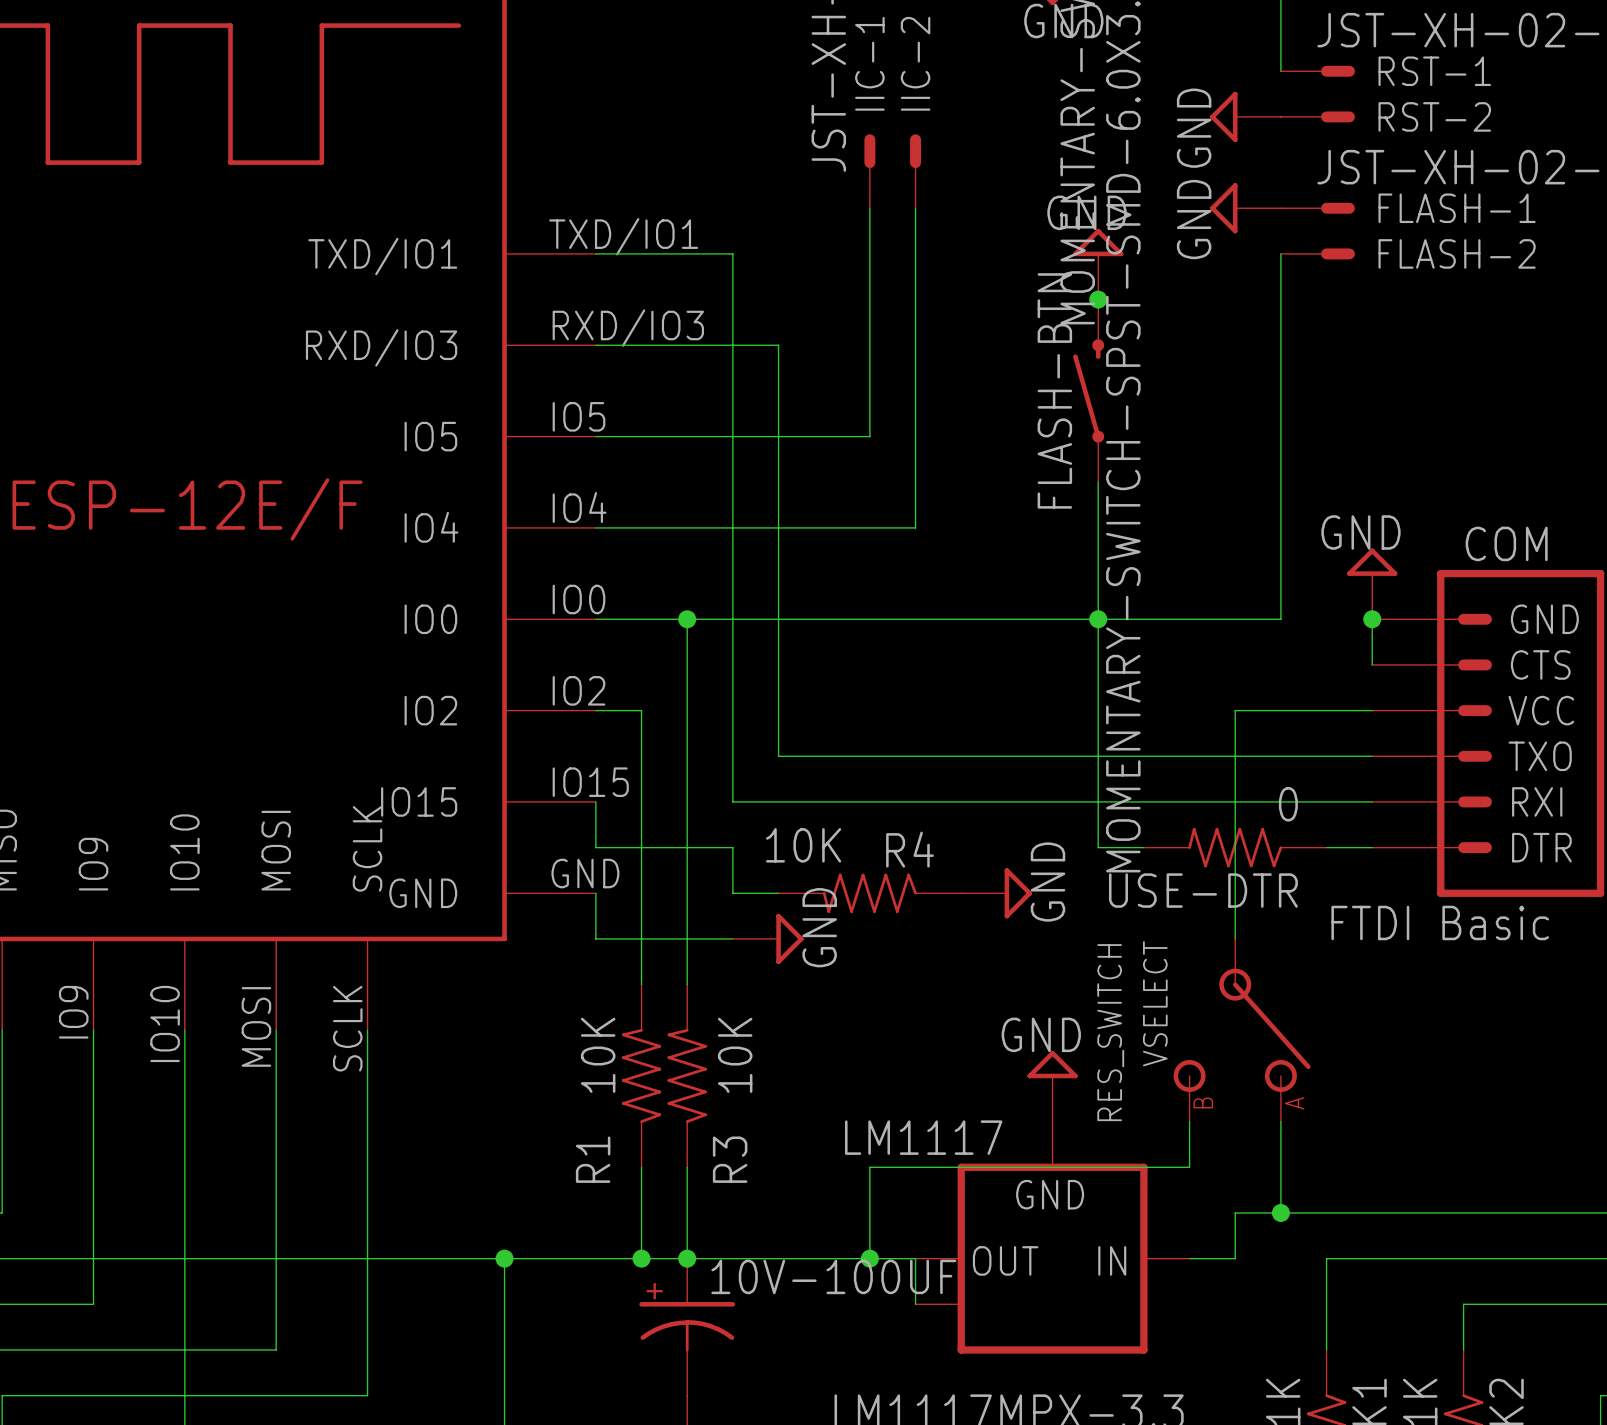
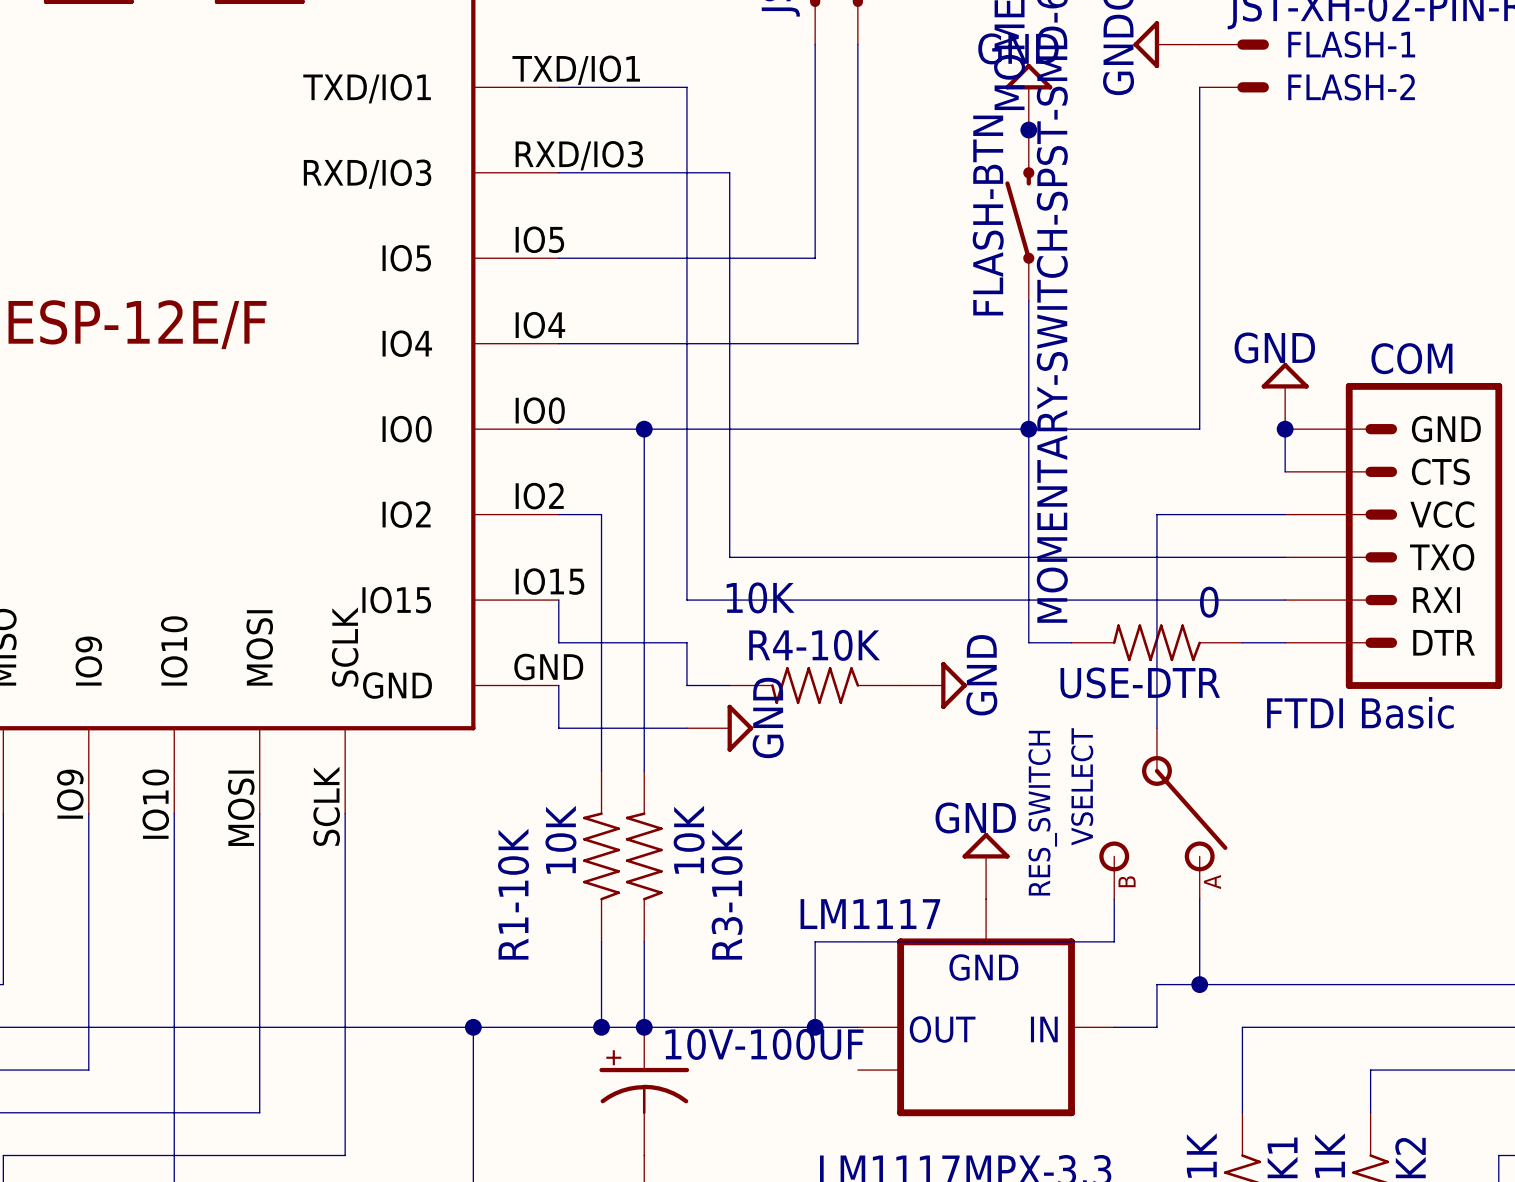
R4 value position: 10K (803, 845) -> 10K (760, 597)
R4 name: R4 (909, 849) -> R4-10K (814, 645)
R1 name: R1 (593, 1159) -> R1-10K (513, 894)
R3 name: R3 (730, 1159) -> R3-10K (727, 894)
wire: (915, 1258) (915, 1304) -> none

